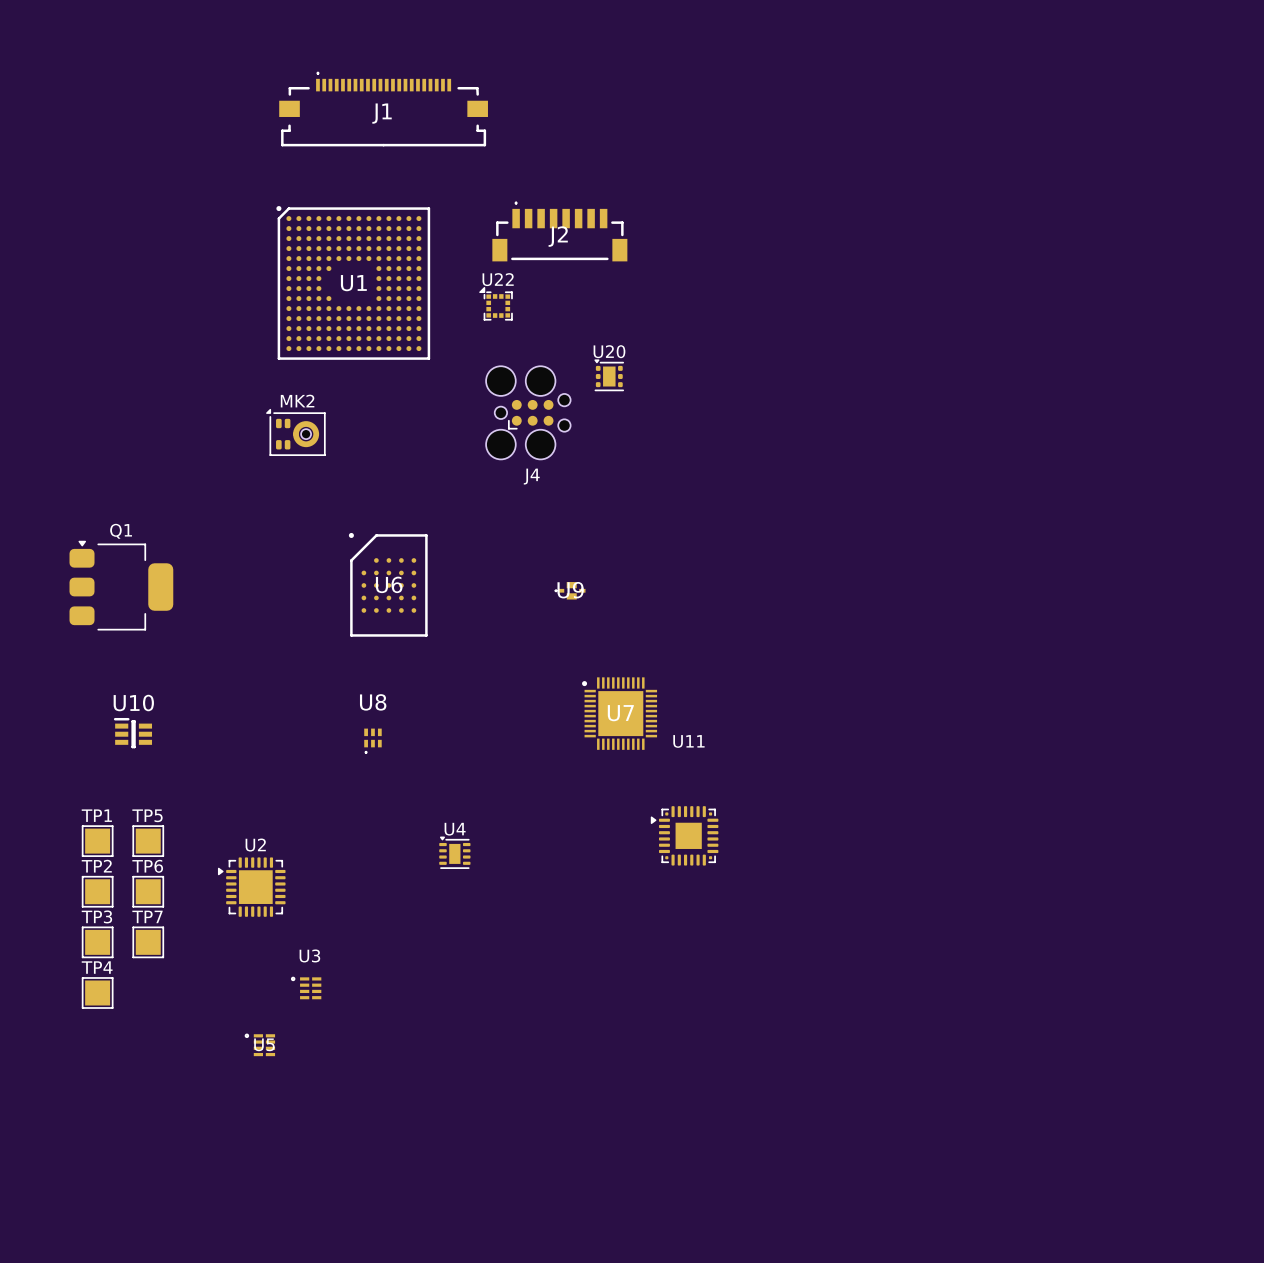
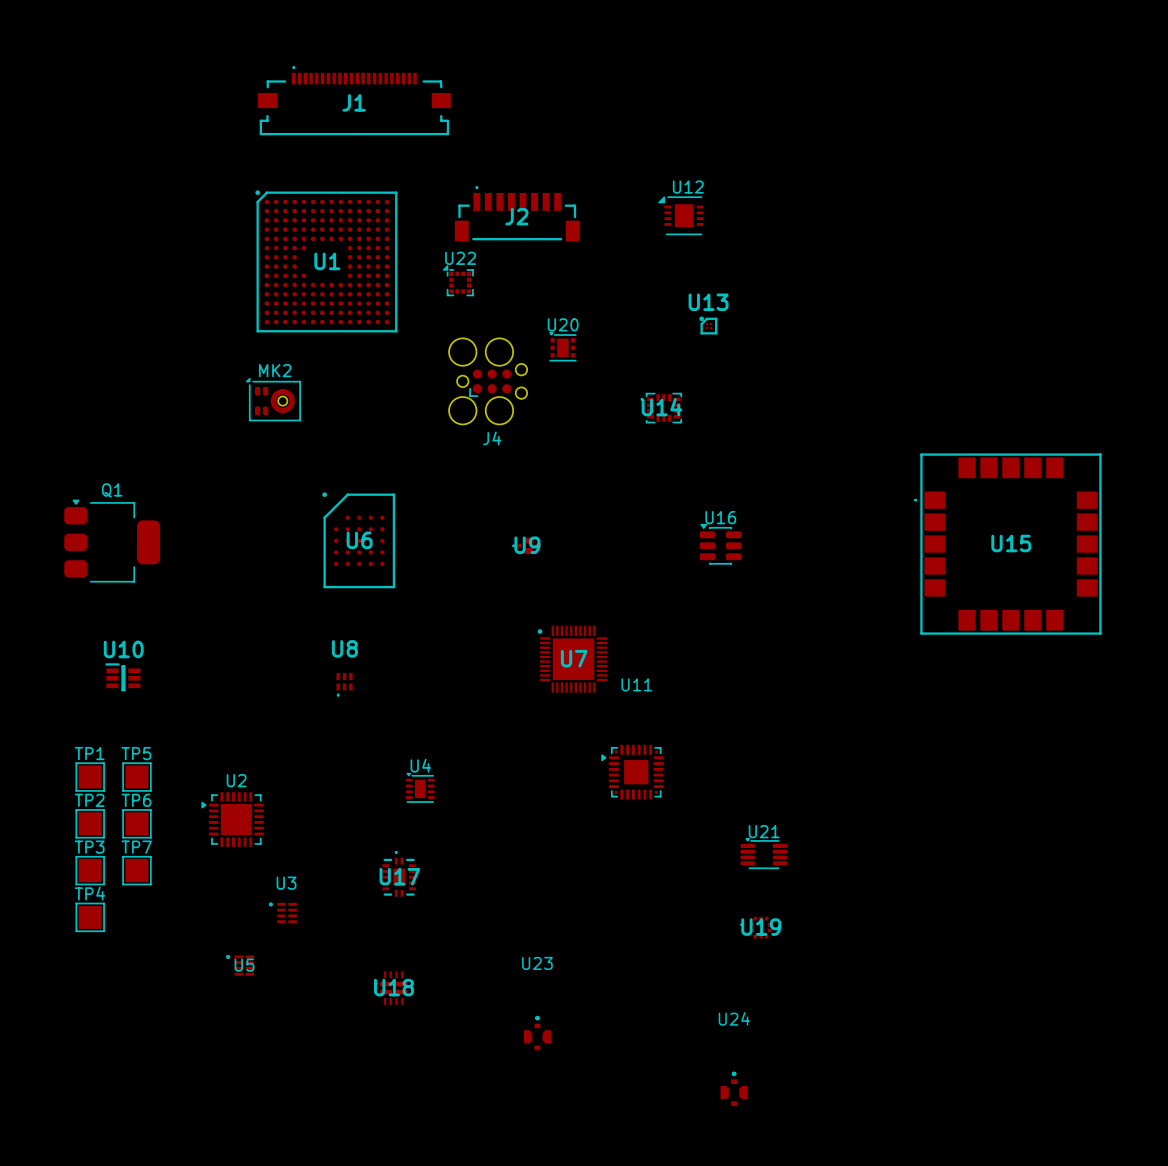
U12: none -> (680, 215)
U13: none -> (708, 325)
U14: none -> (661, 408)
U15: none -> (1008, 544)
U16: none -> (720, 544)
U21: none -> (763, 853)
U17: none -> (399, 874)
U19: none -> (756, 927)
U18: none -> (390, 988)
U23: none -> (537, 1033)
U24: none -> (734, 1088)

